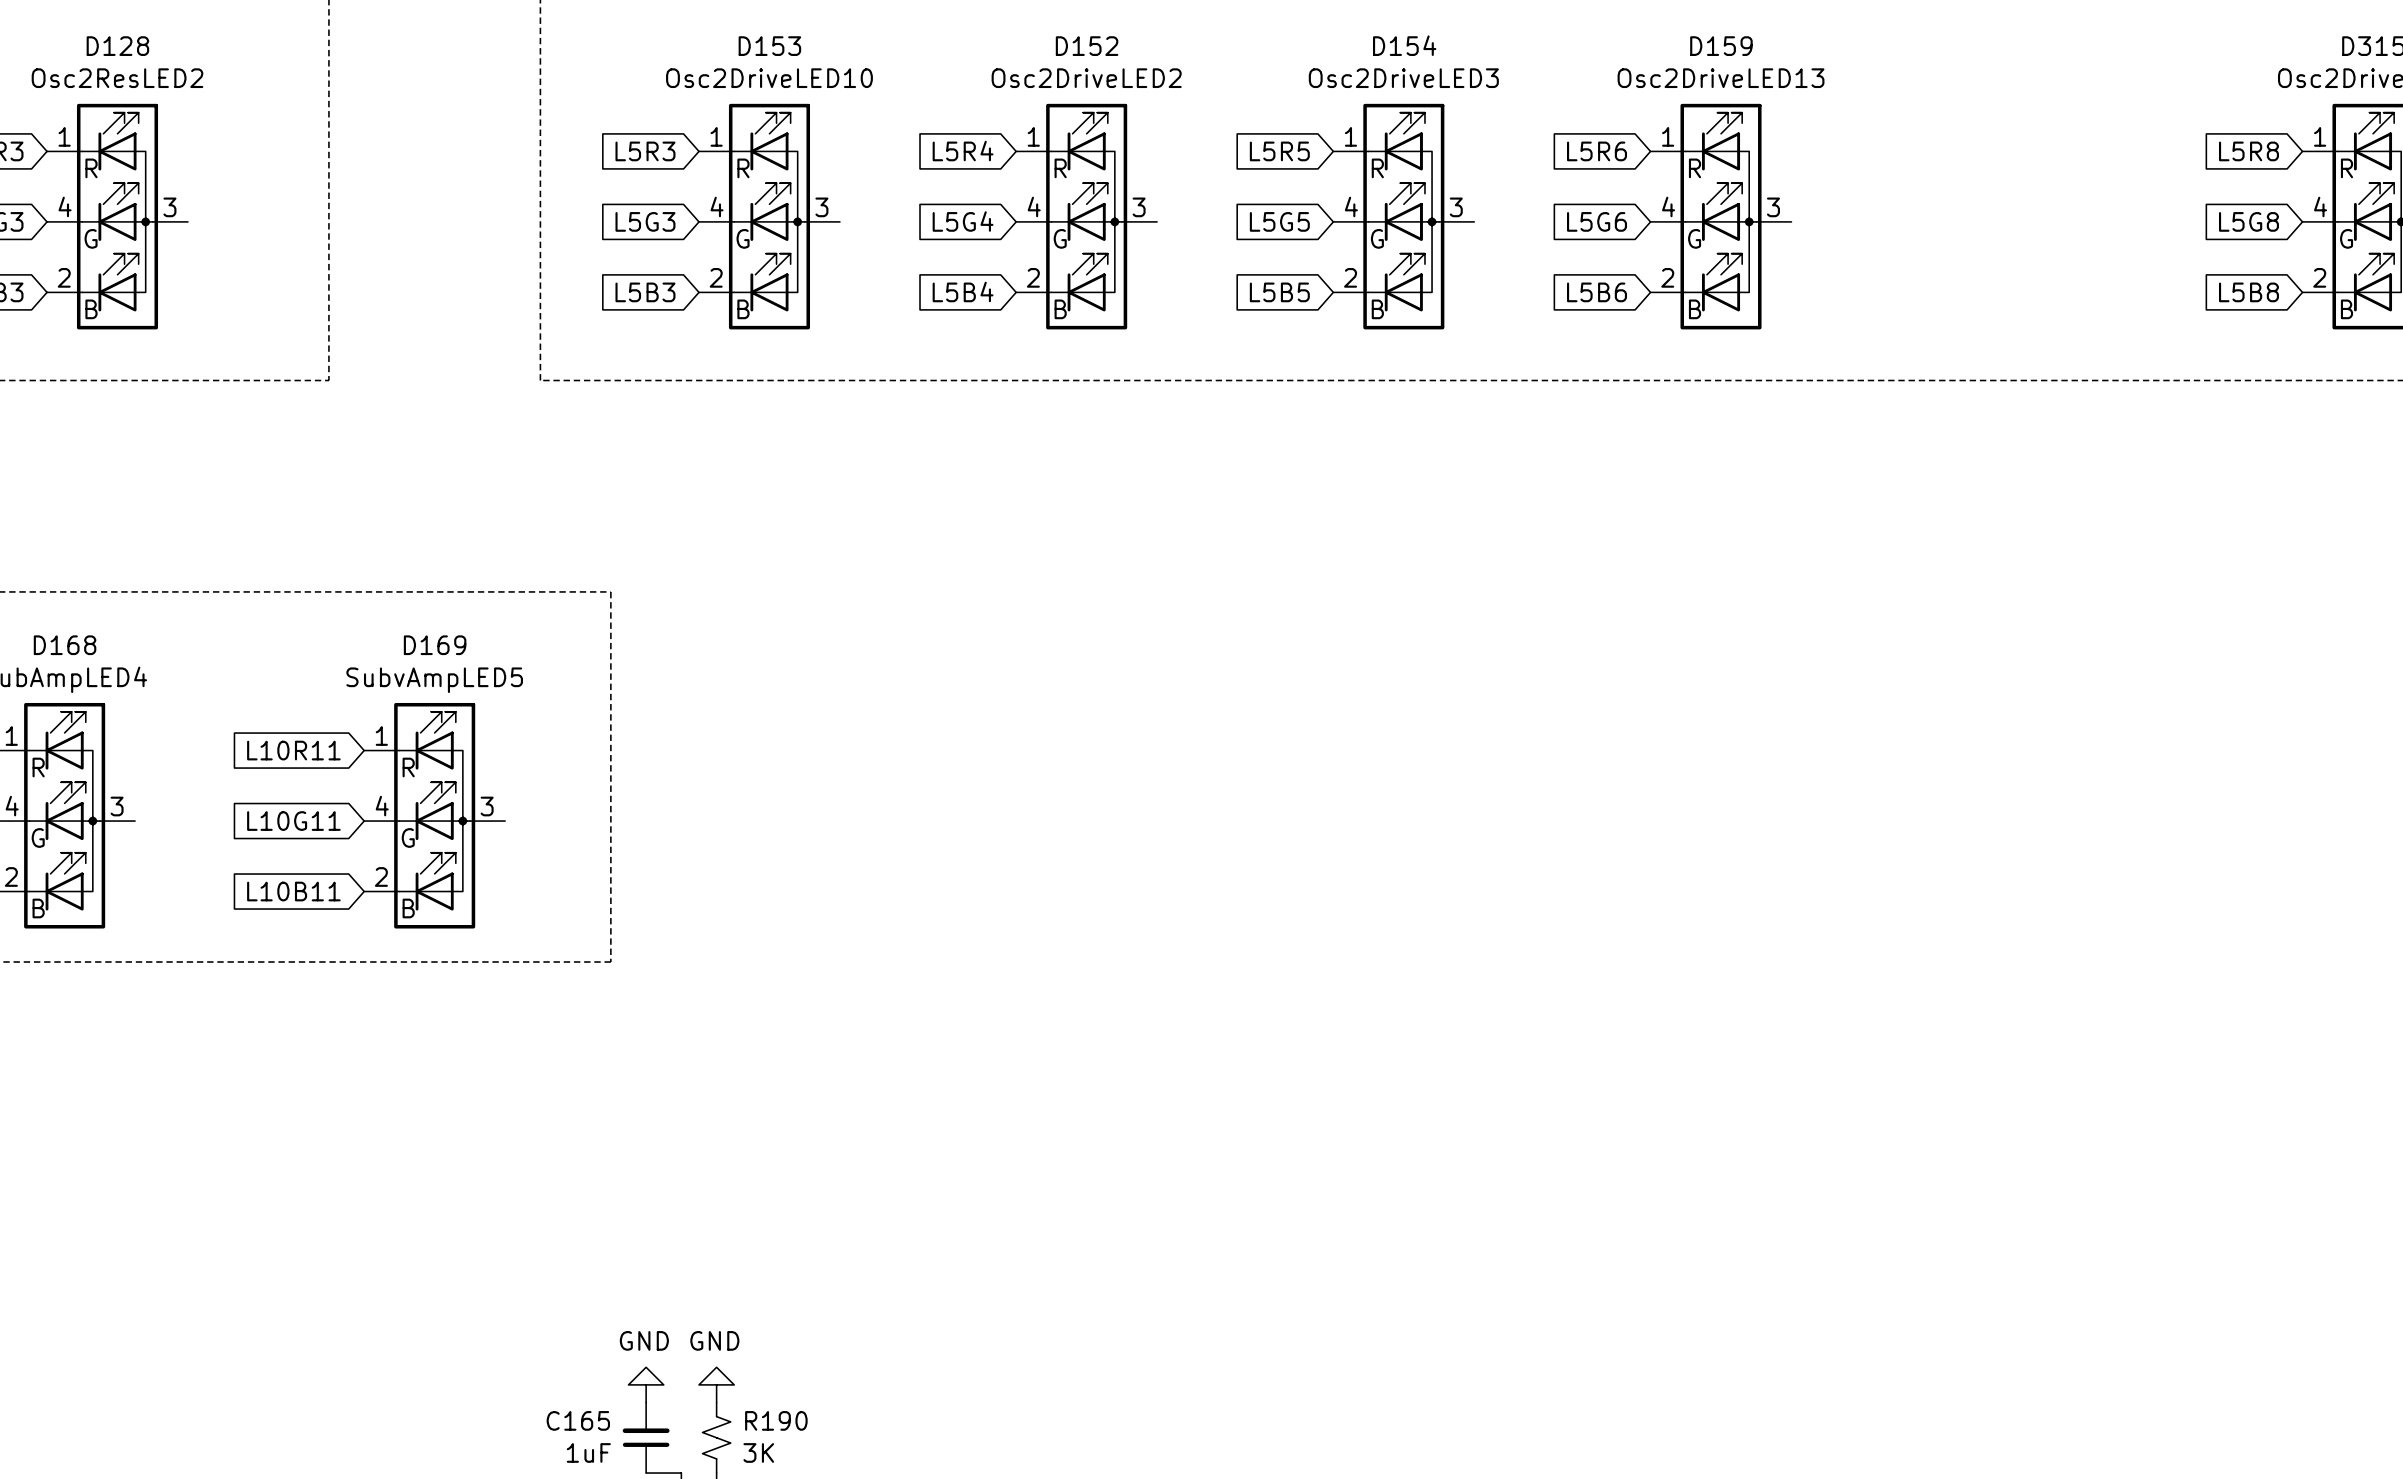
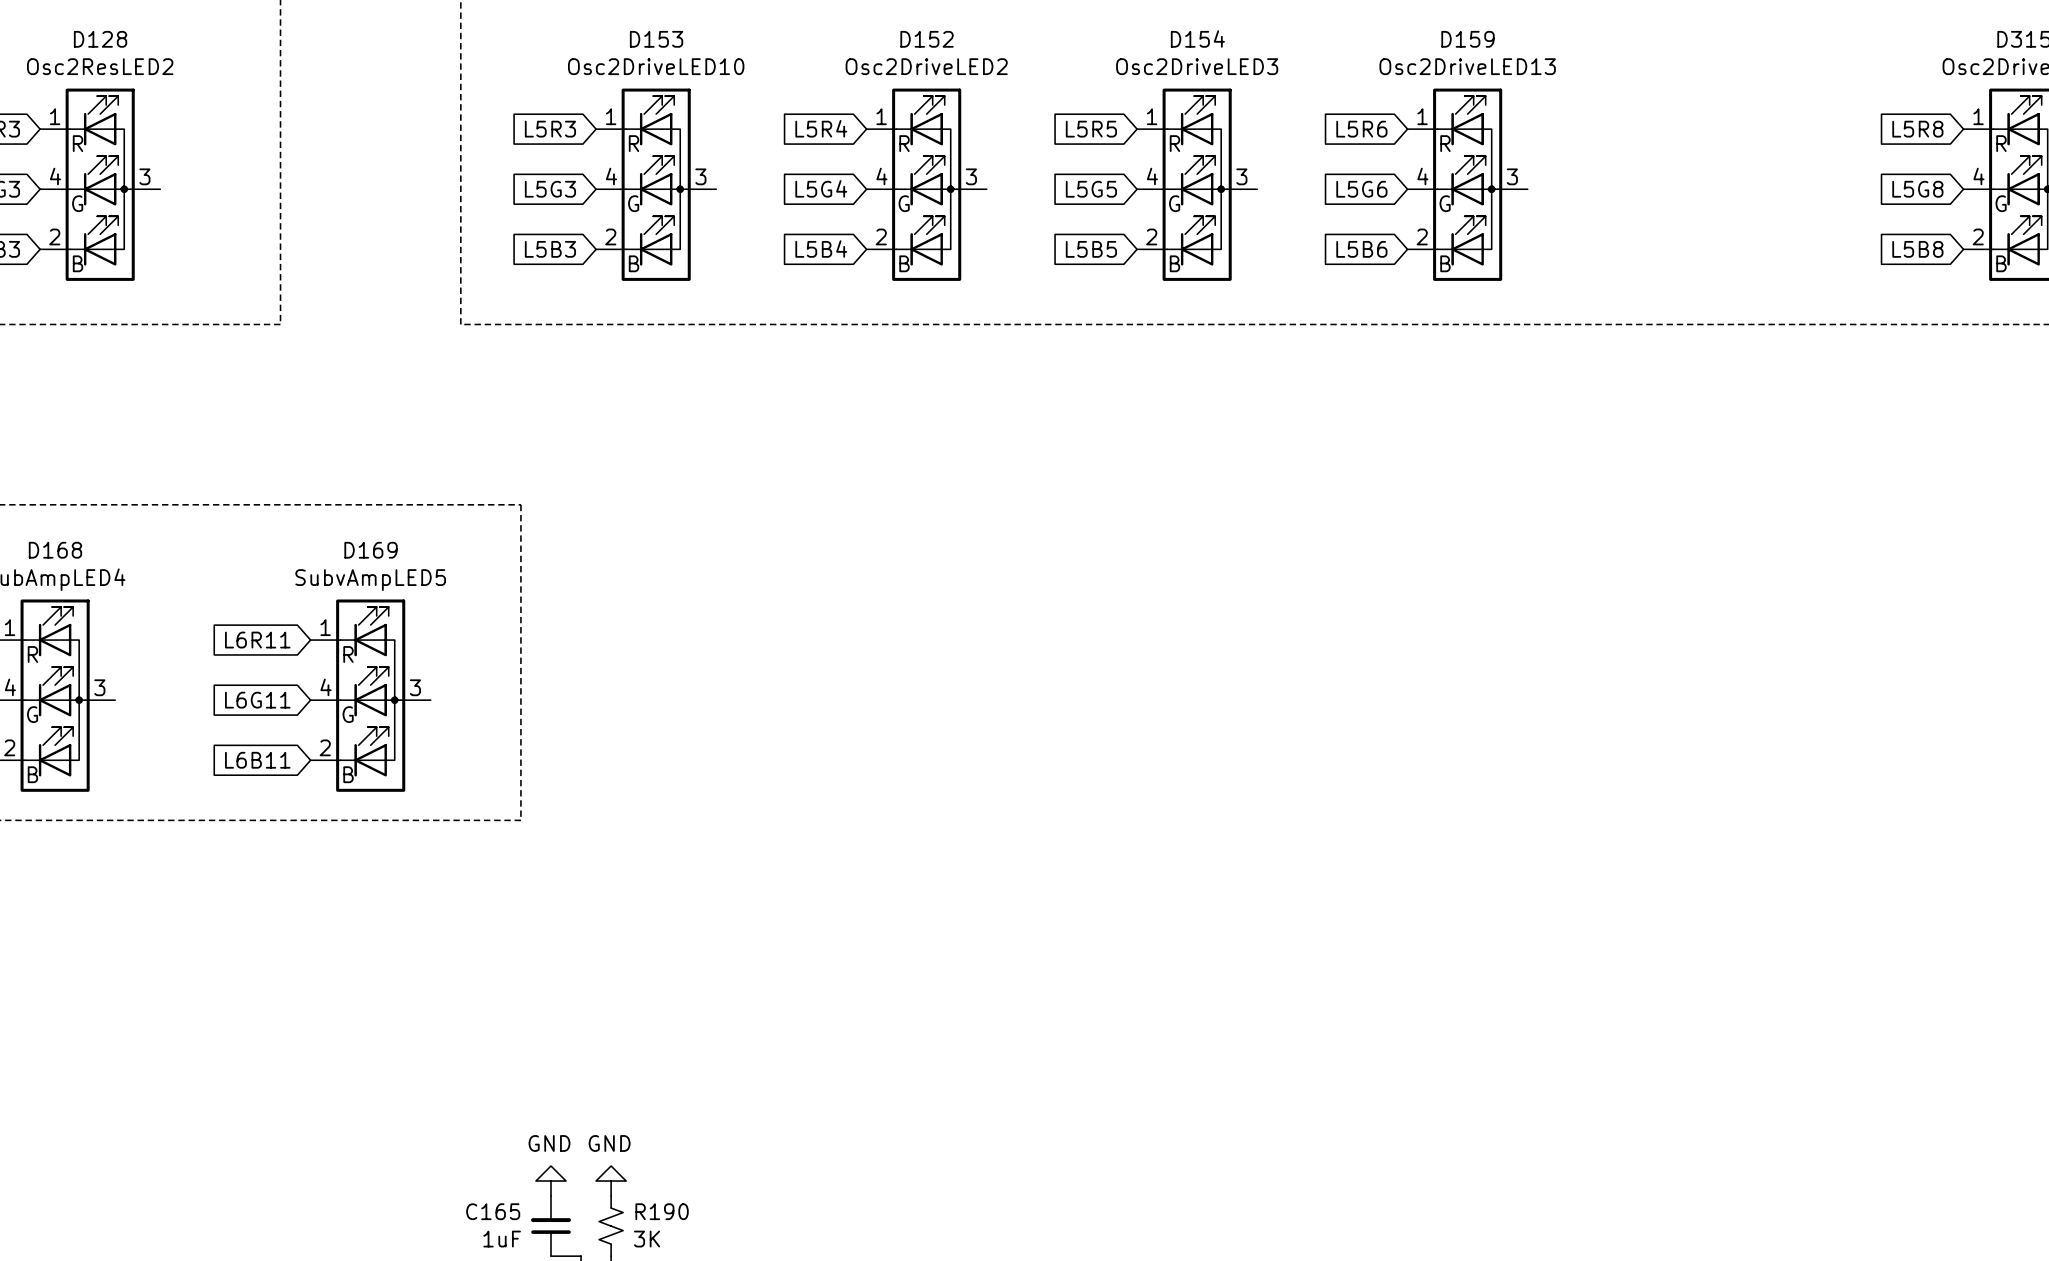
global label: L10R11 (293, 750) -> L6R11 (257, 640)
global label: L10G11 (293, 821) -> L6G11 (257, 700)
global label: L10B11 (293, 891) -> L6B11 (257, 760)

